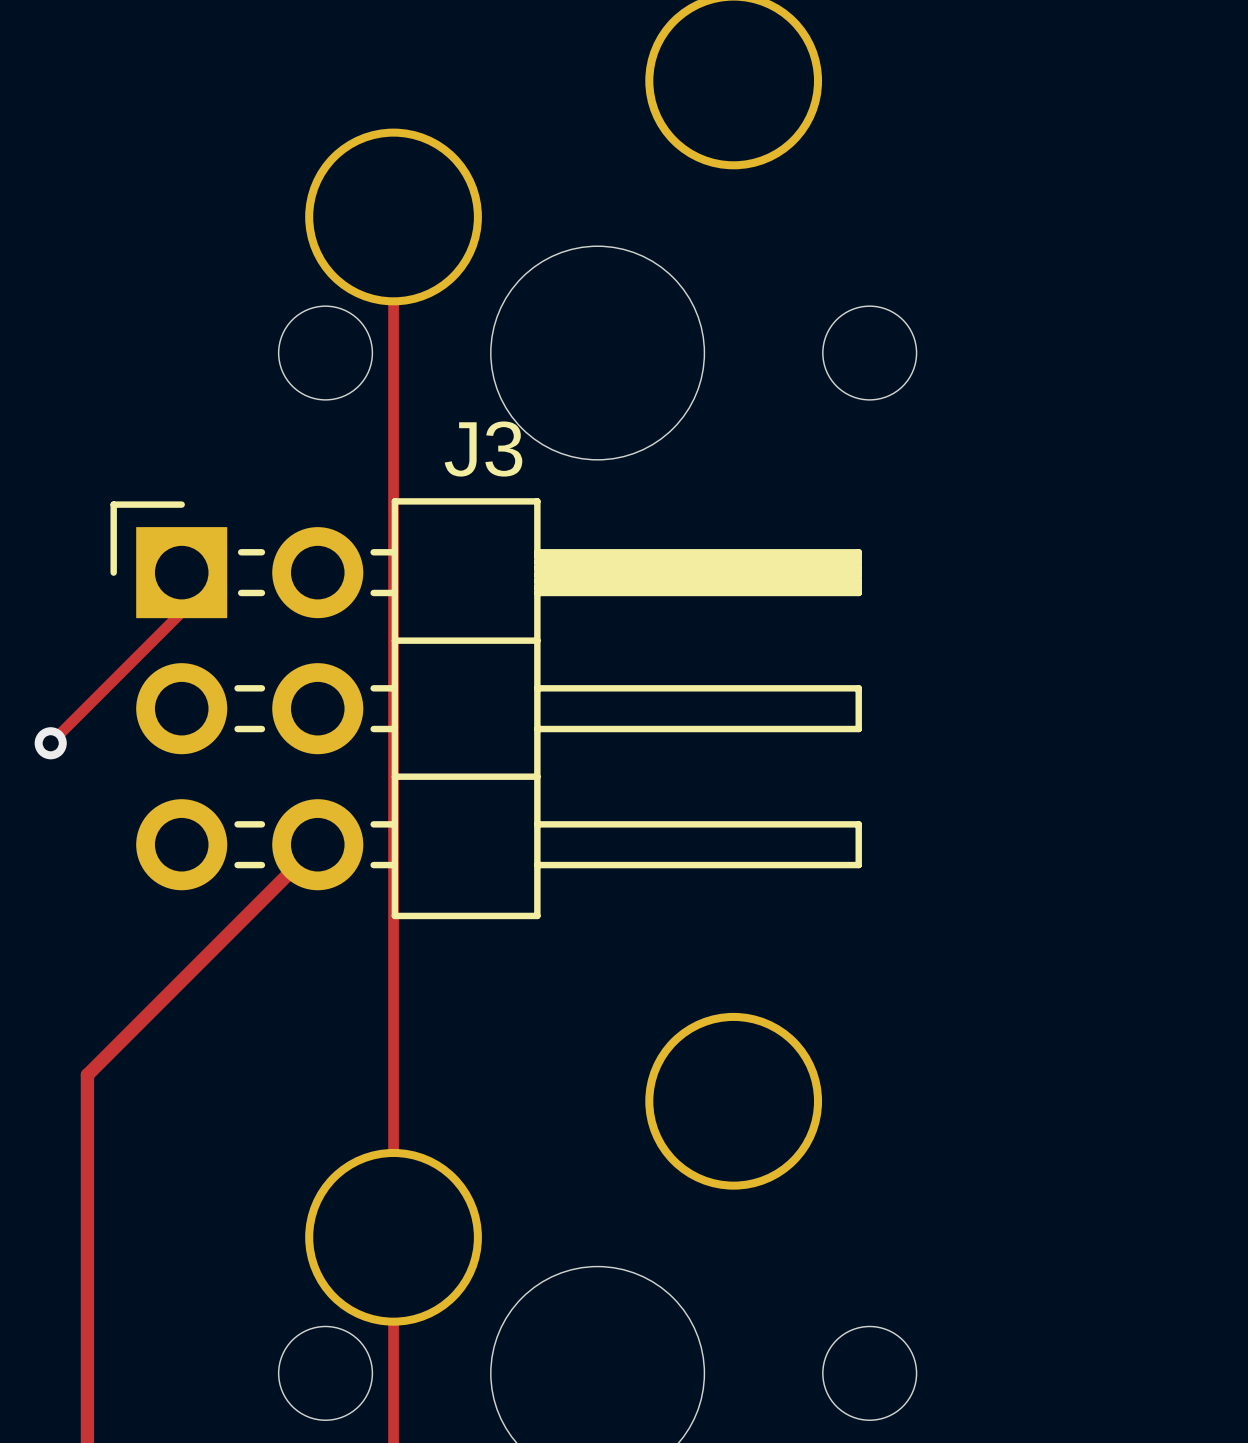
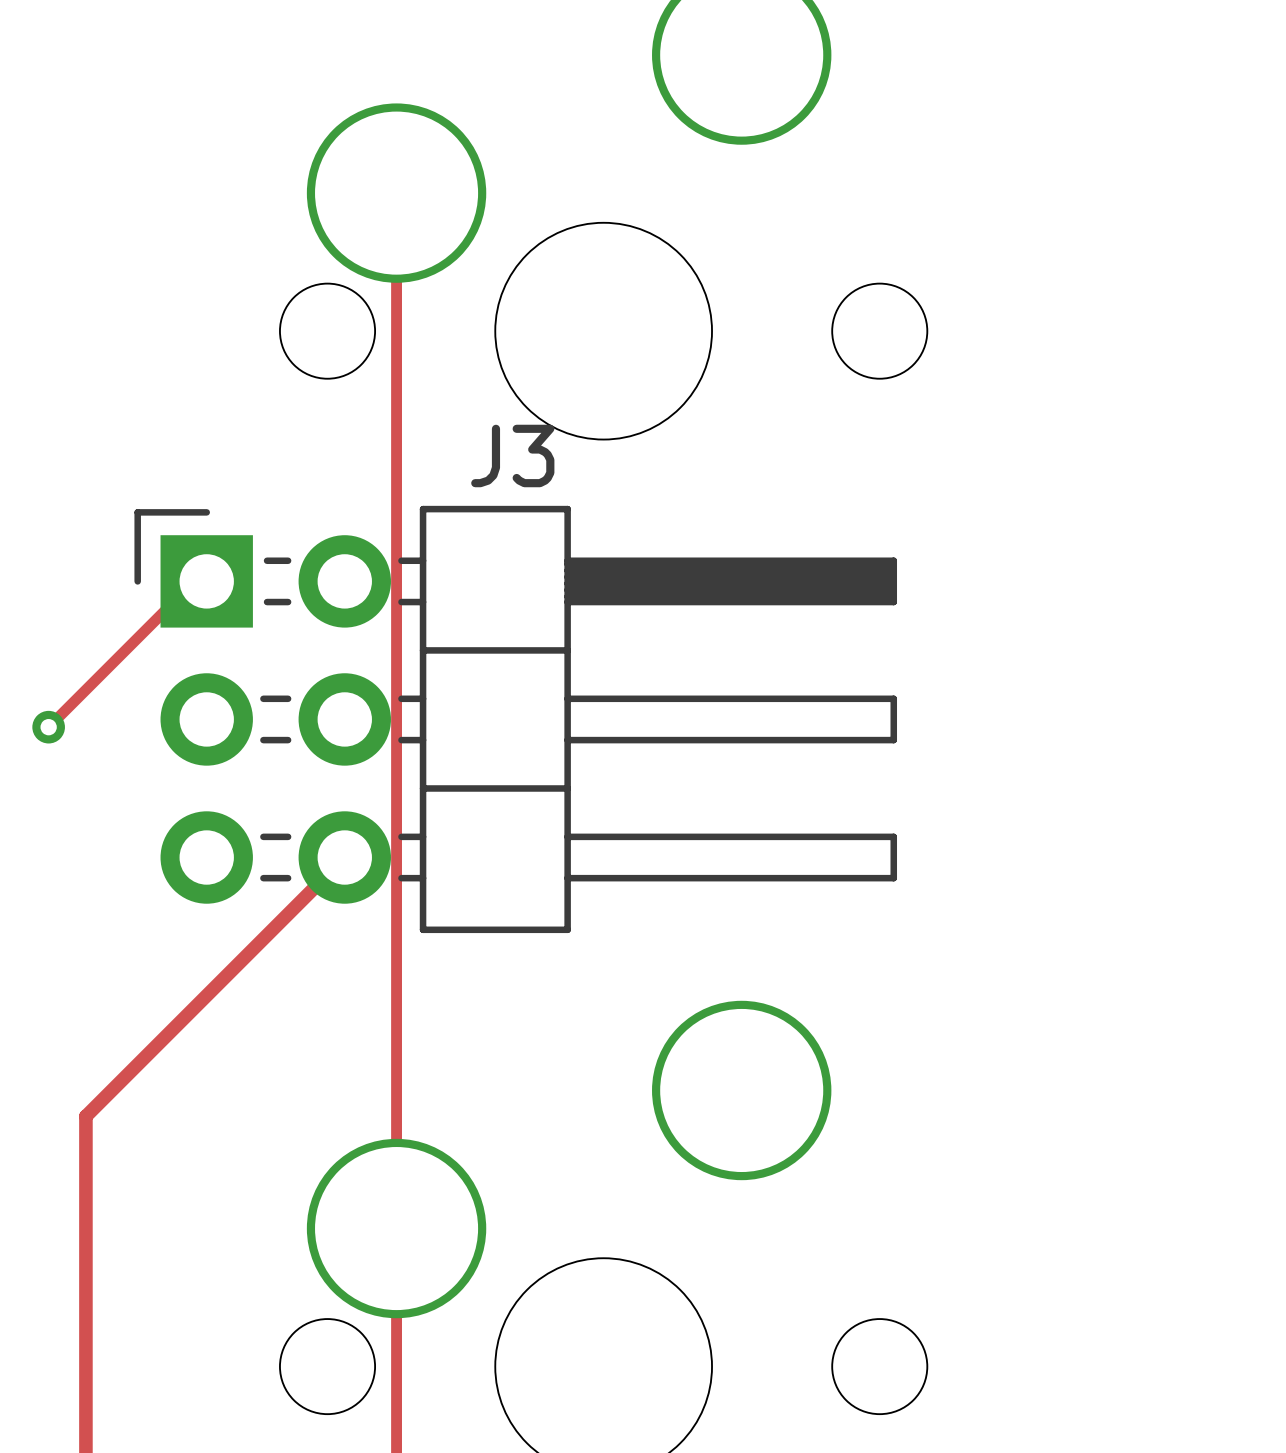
J3 position: (486, 708) -> (515, 719)
track: (317, 844) (87, 1075) (87, 1126) -> (344, 857) (85, 1116)

